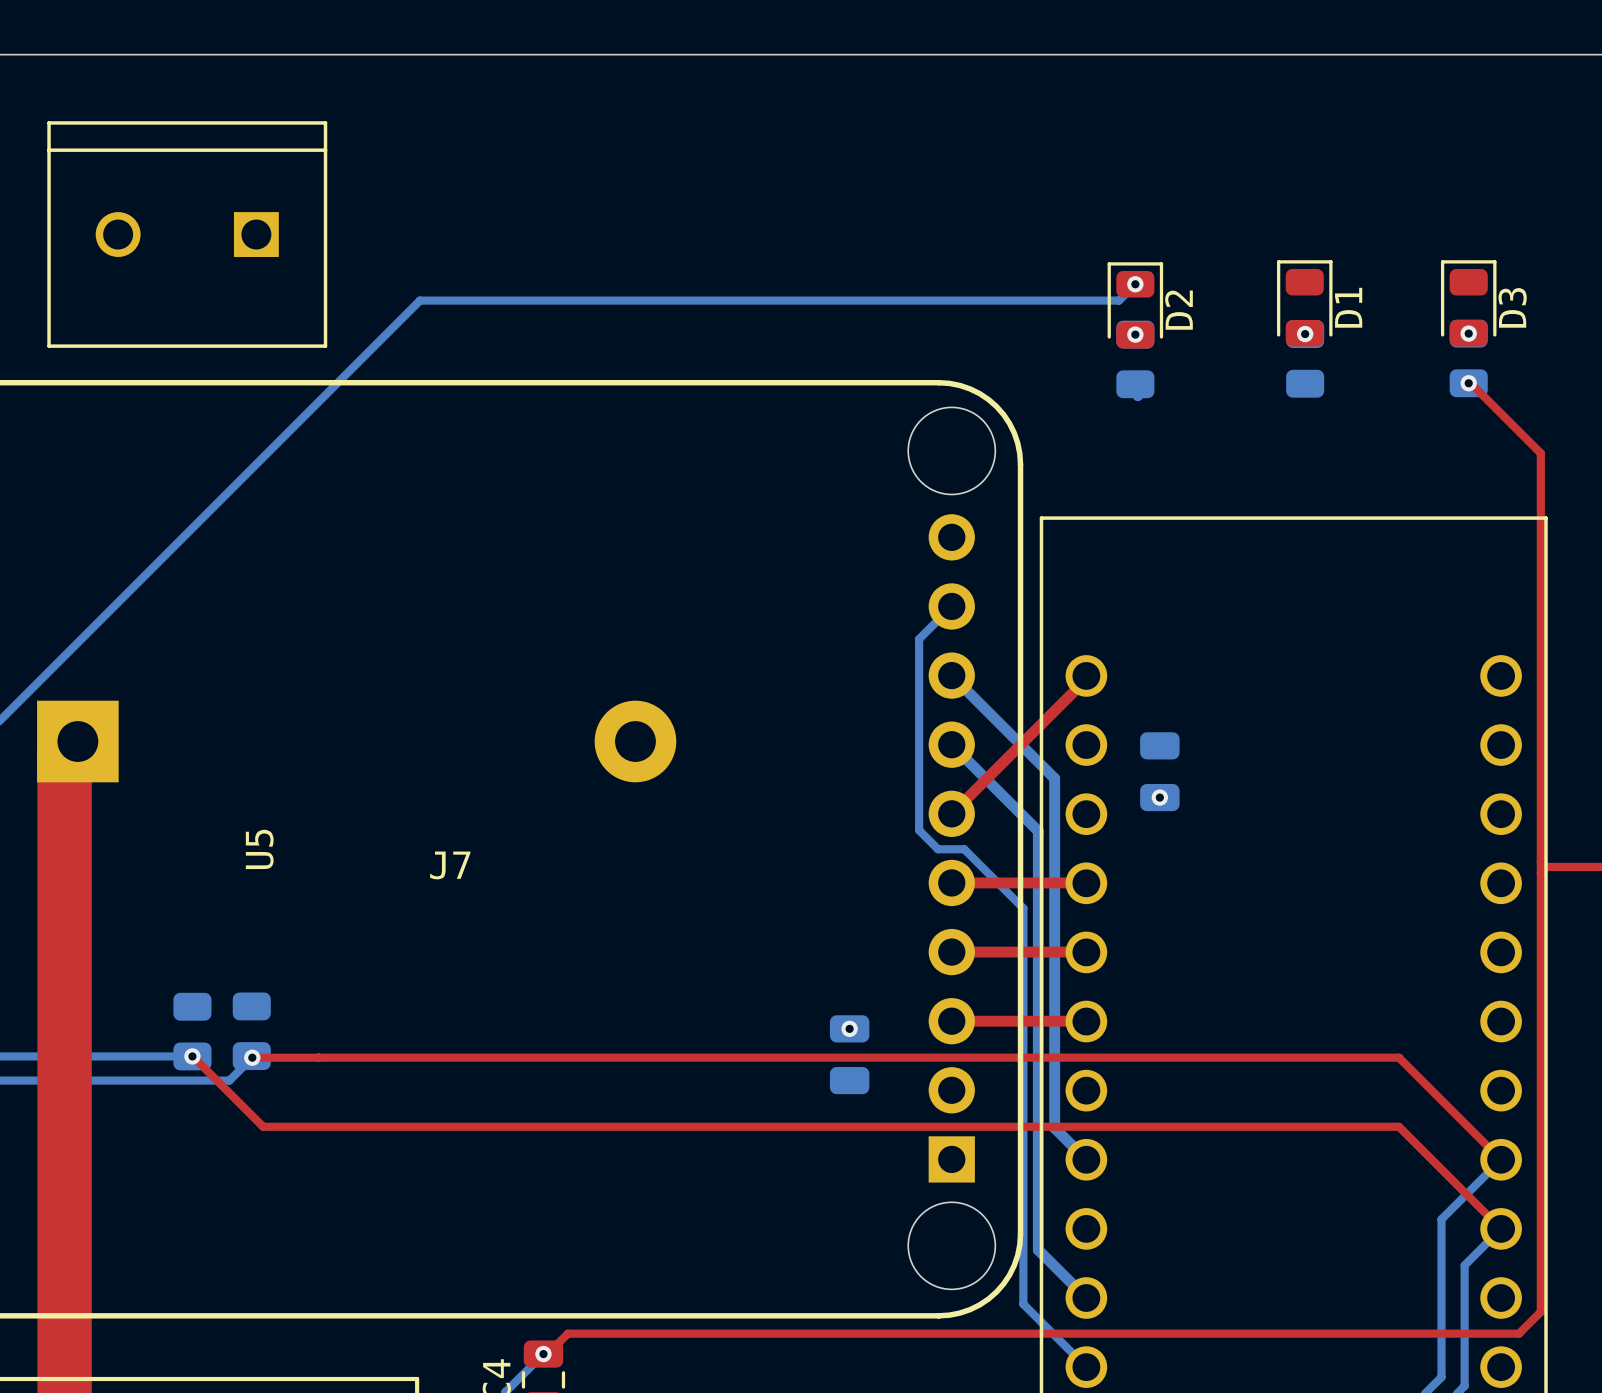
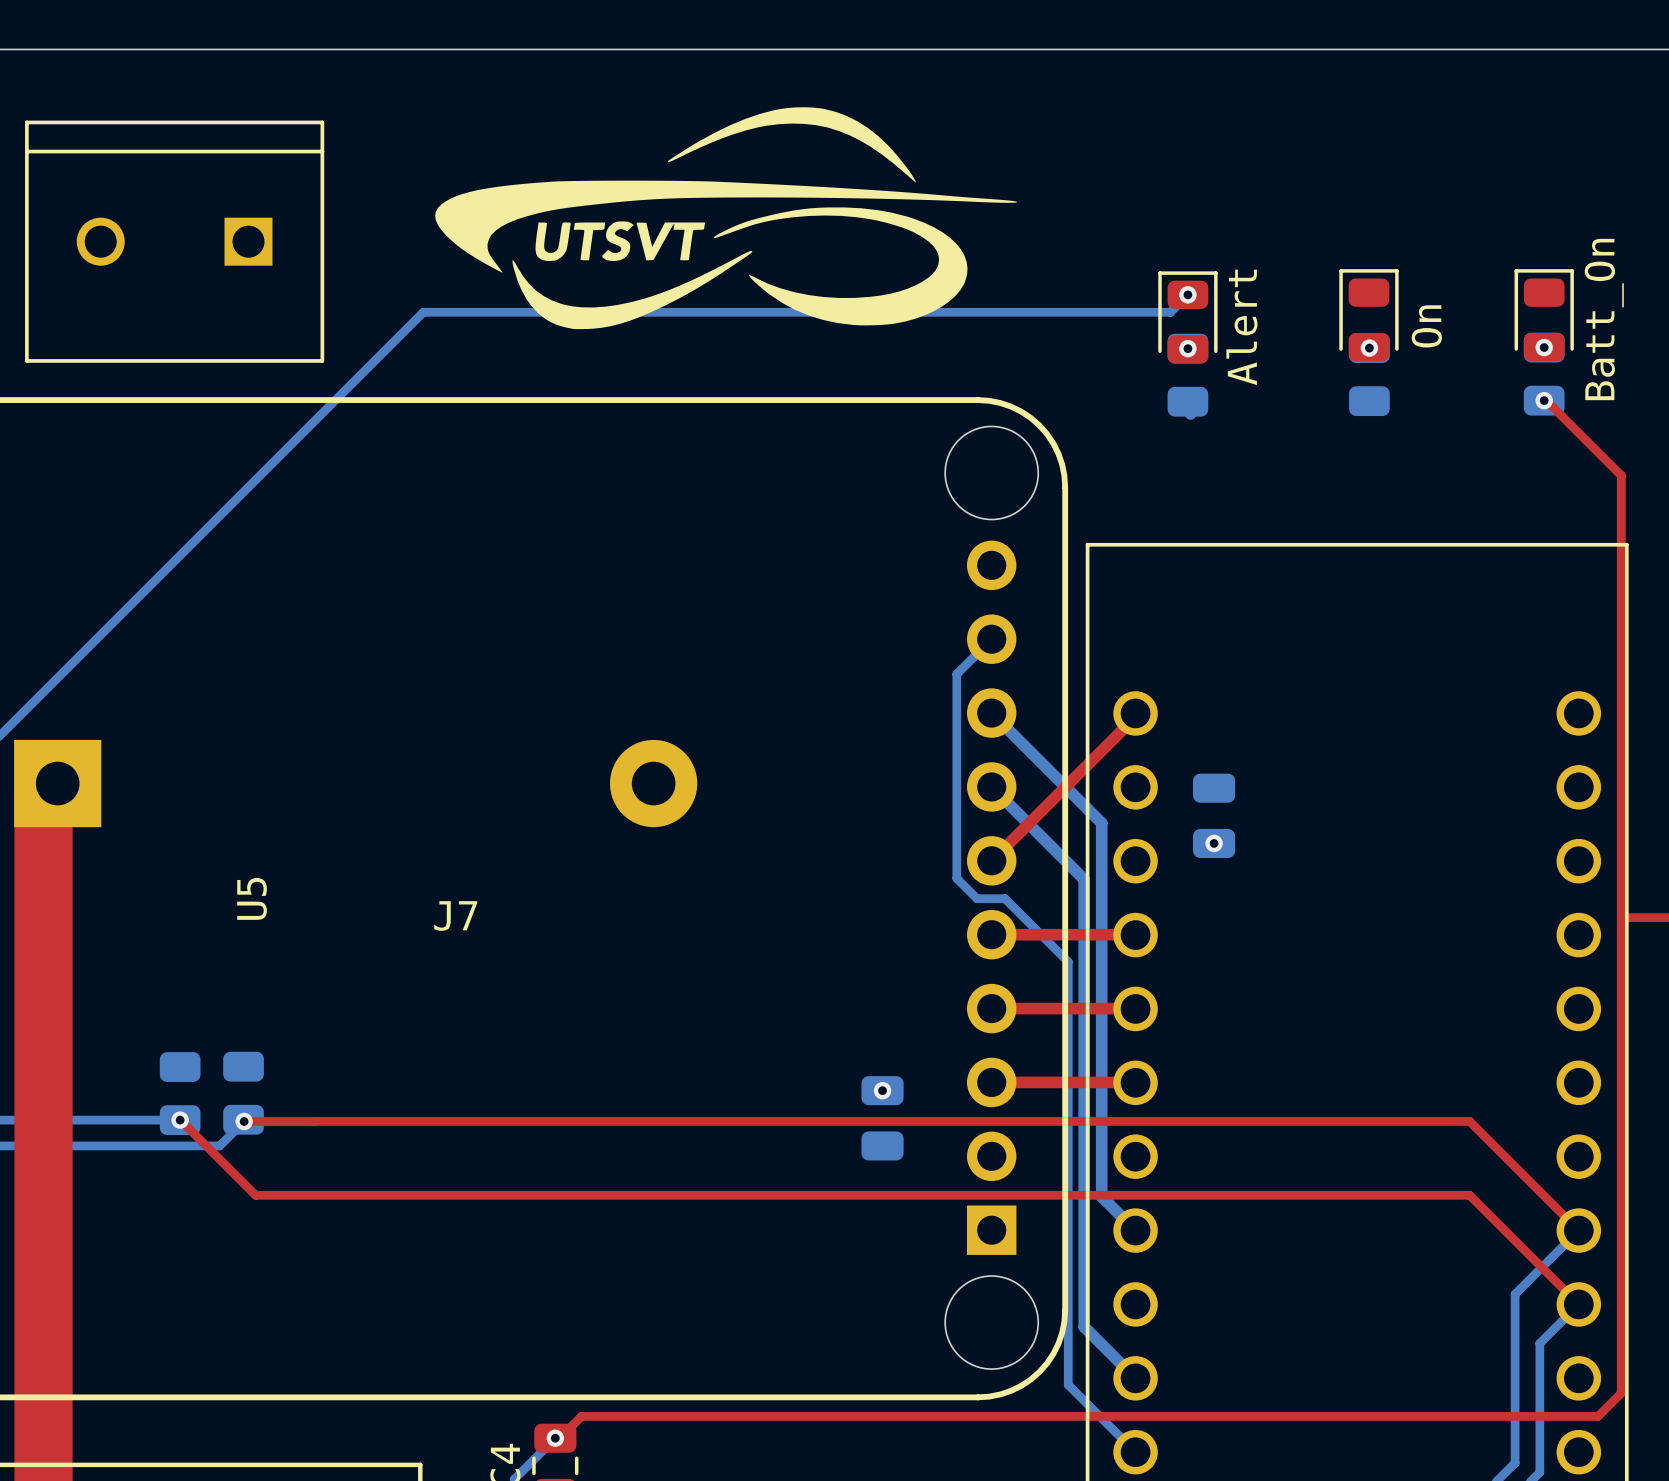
drawing: none -> [435, 107, 1018, 330]
D1 name: D1 (1348, 307) -> On (1426, 326)
D3 name: D3 (1512, 307) -> Batt_On (1604, 319)
D2 name: D2 (1179, 310) -> Alert (1241, 327)

